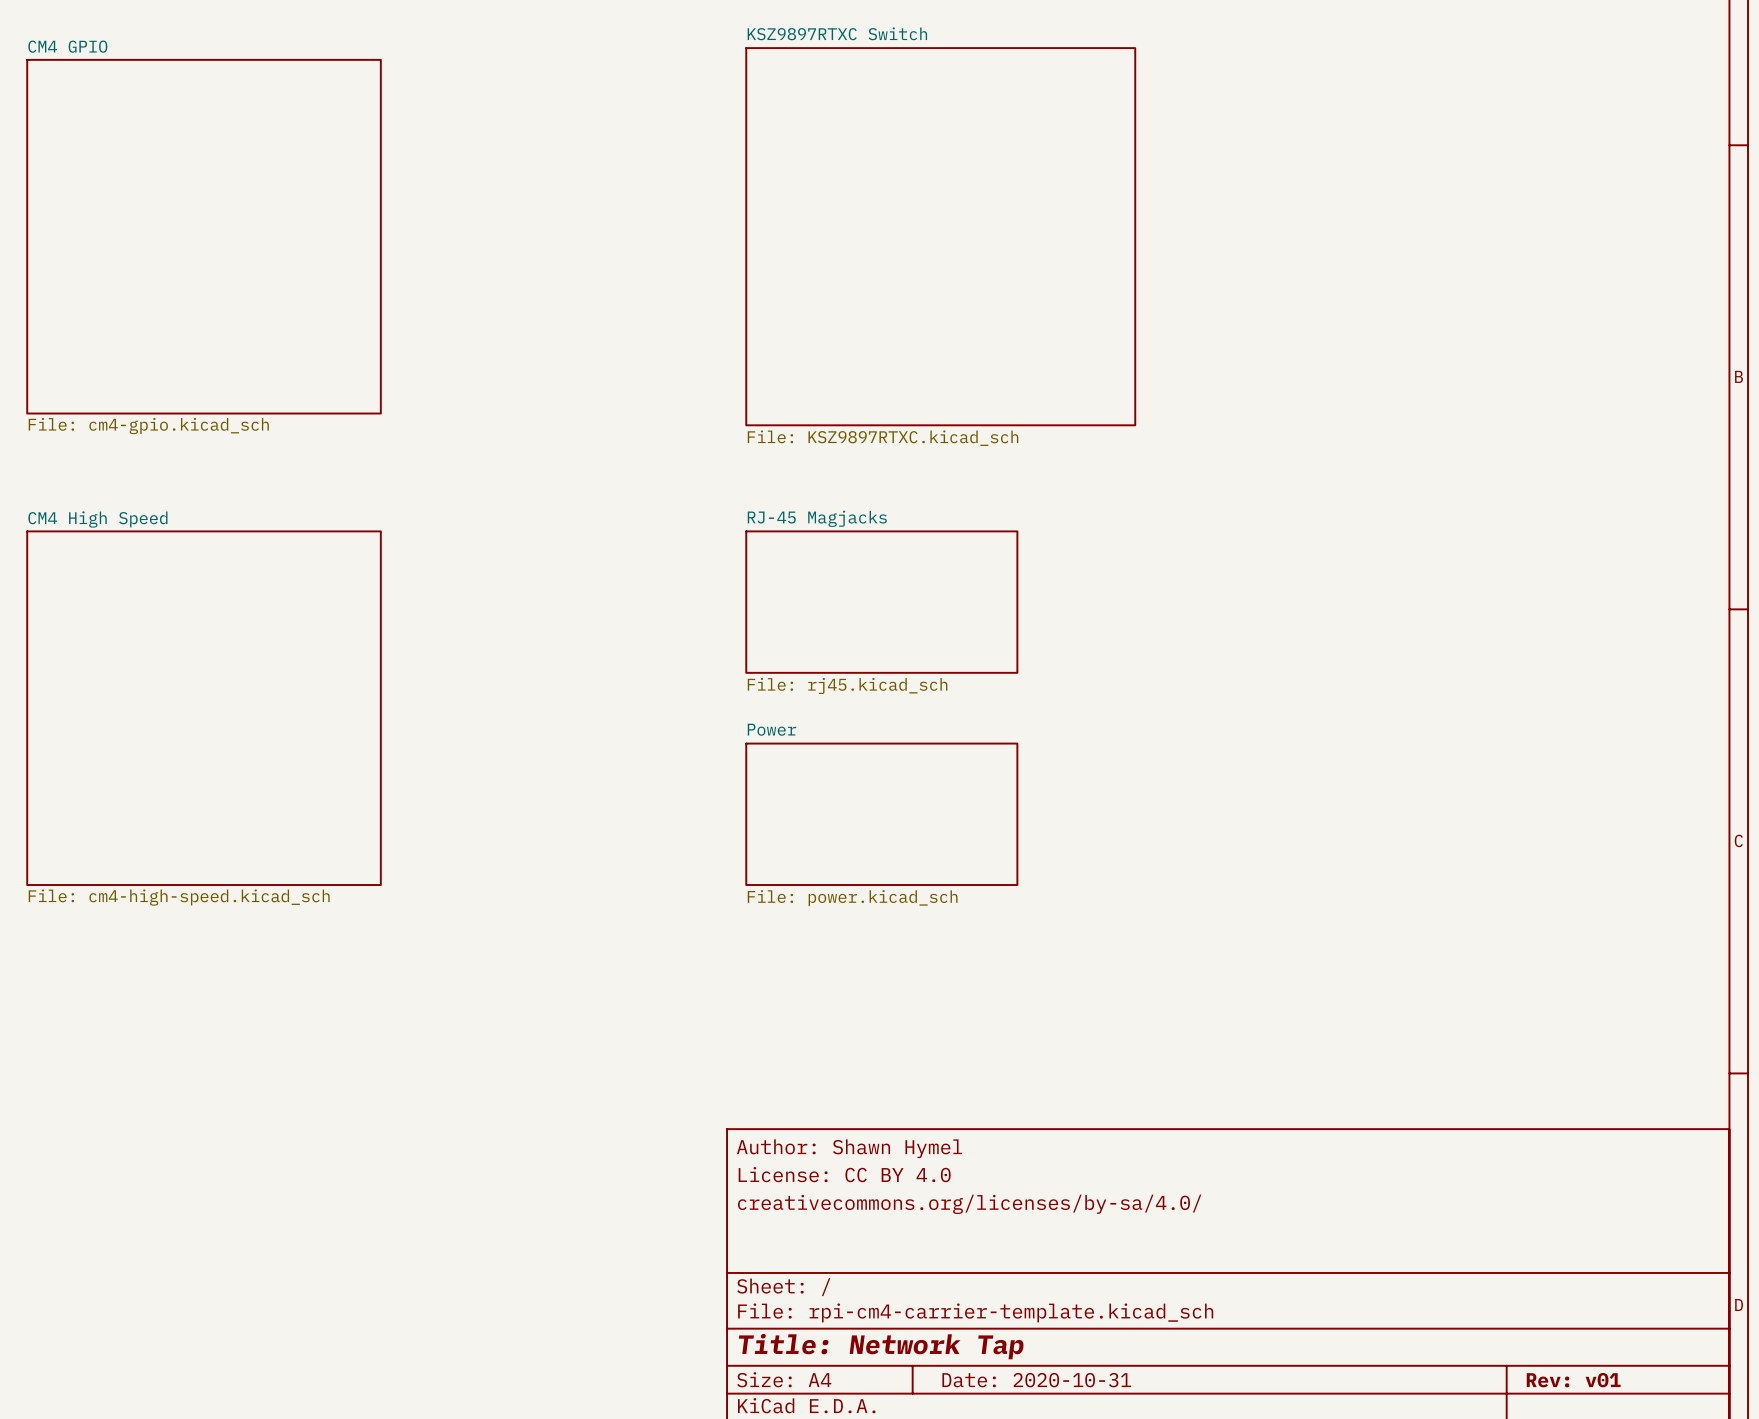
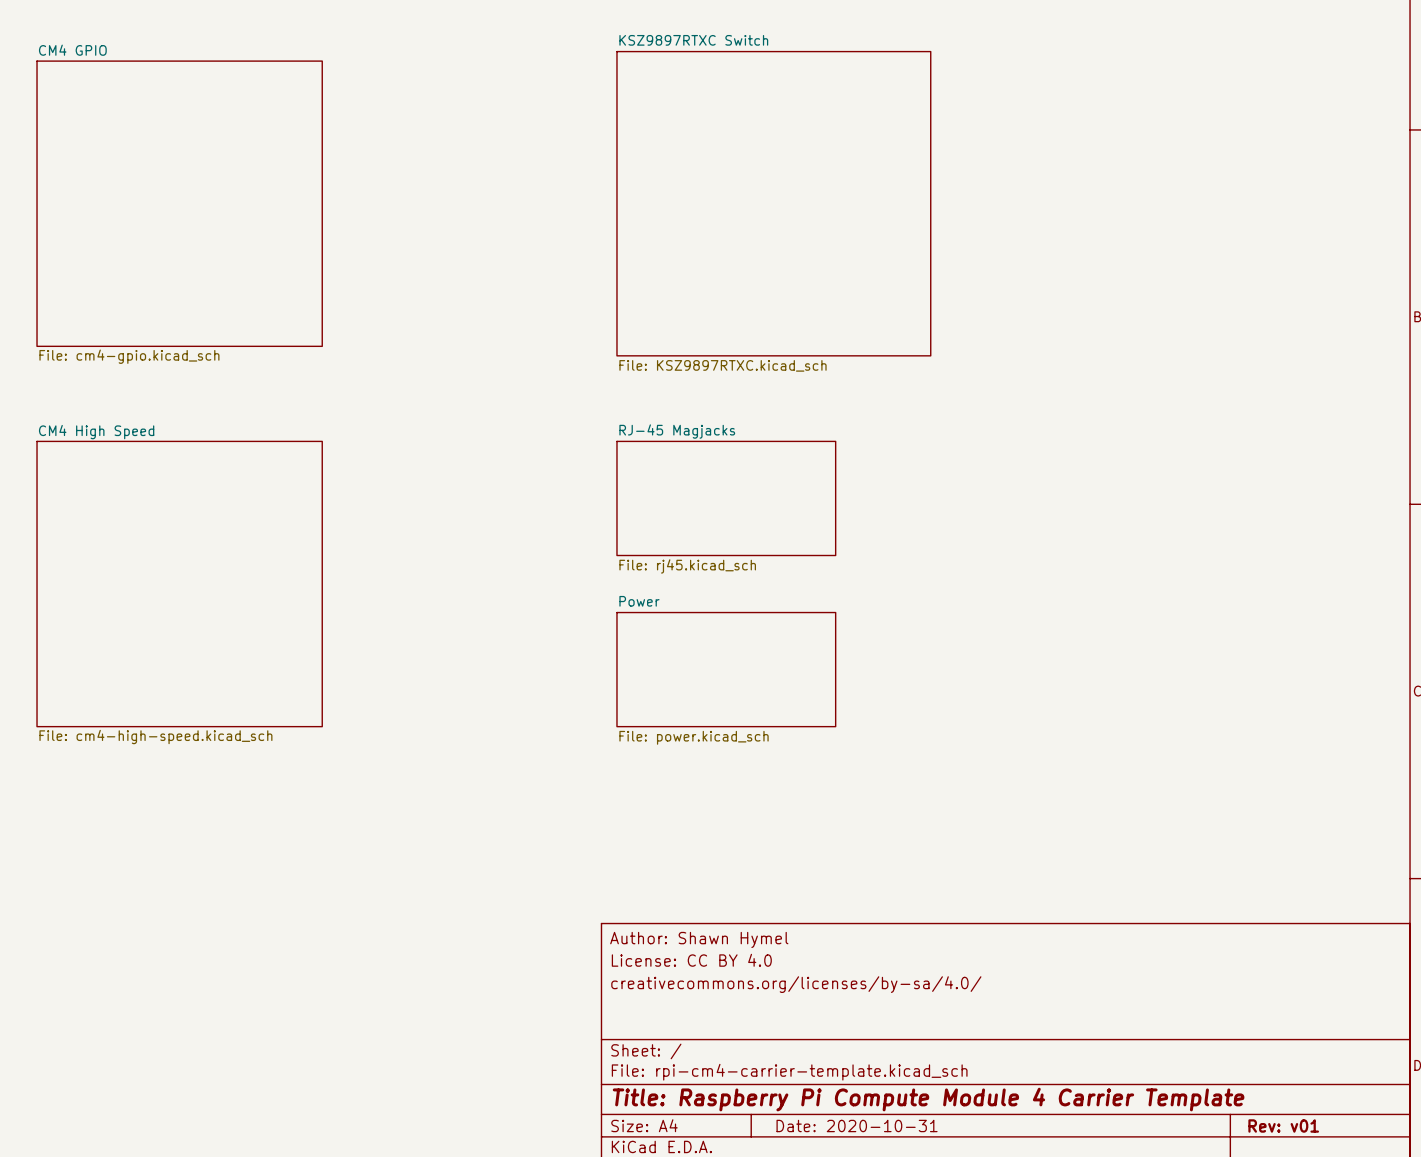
title block: Title: Network Tap (881, 1346) -> Title: Raspberry Pi Compute Module 4 Carrier Template (928, 1099)

